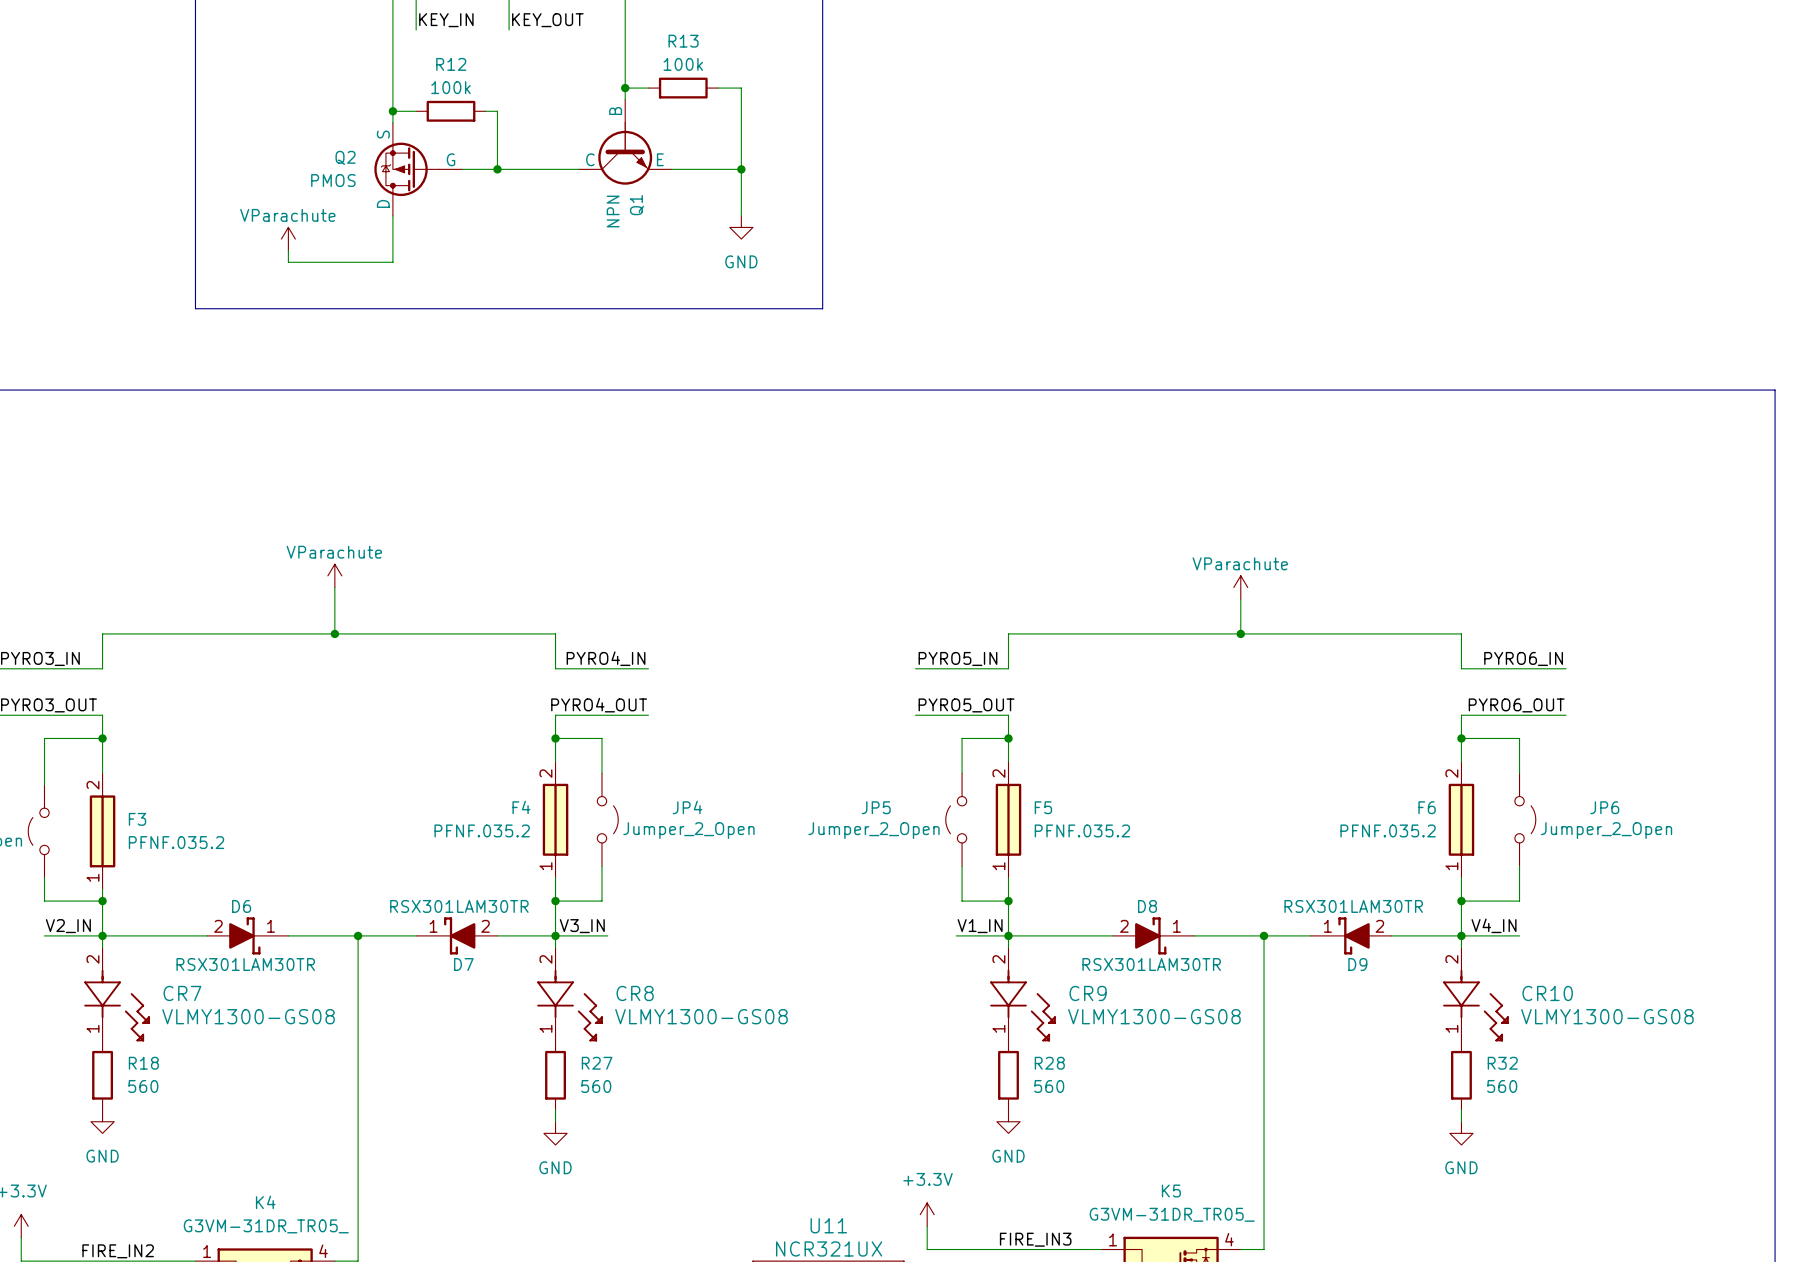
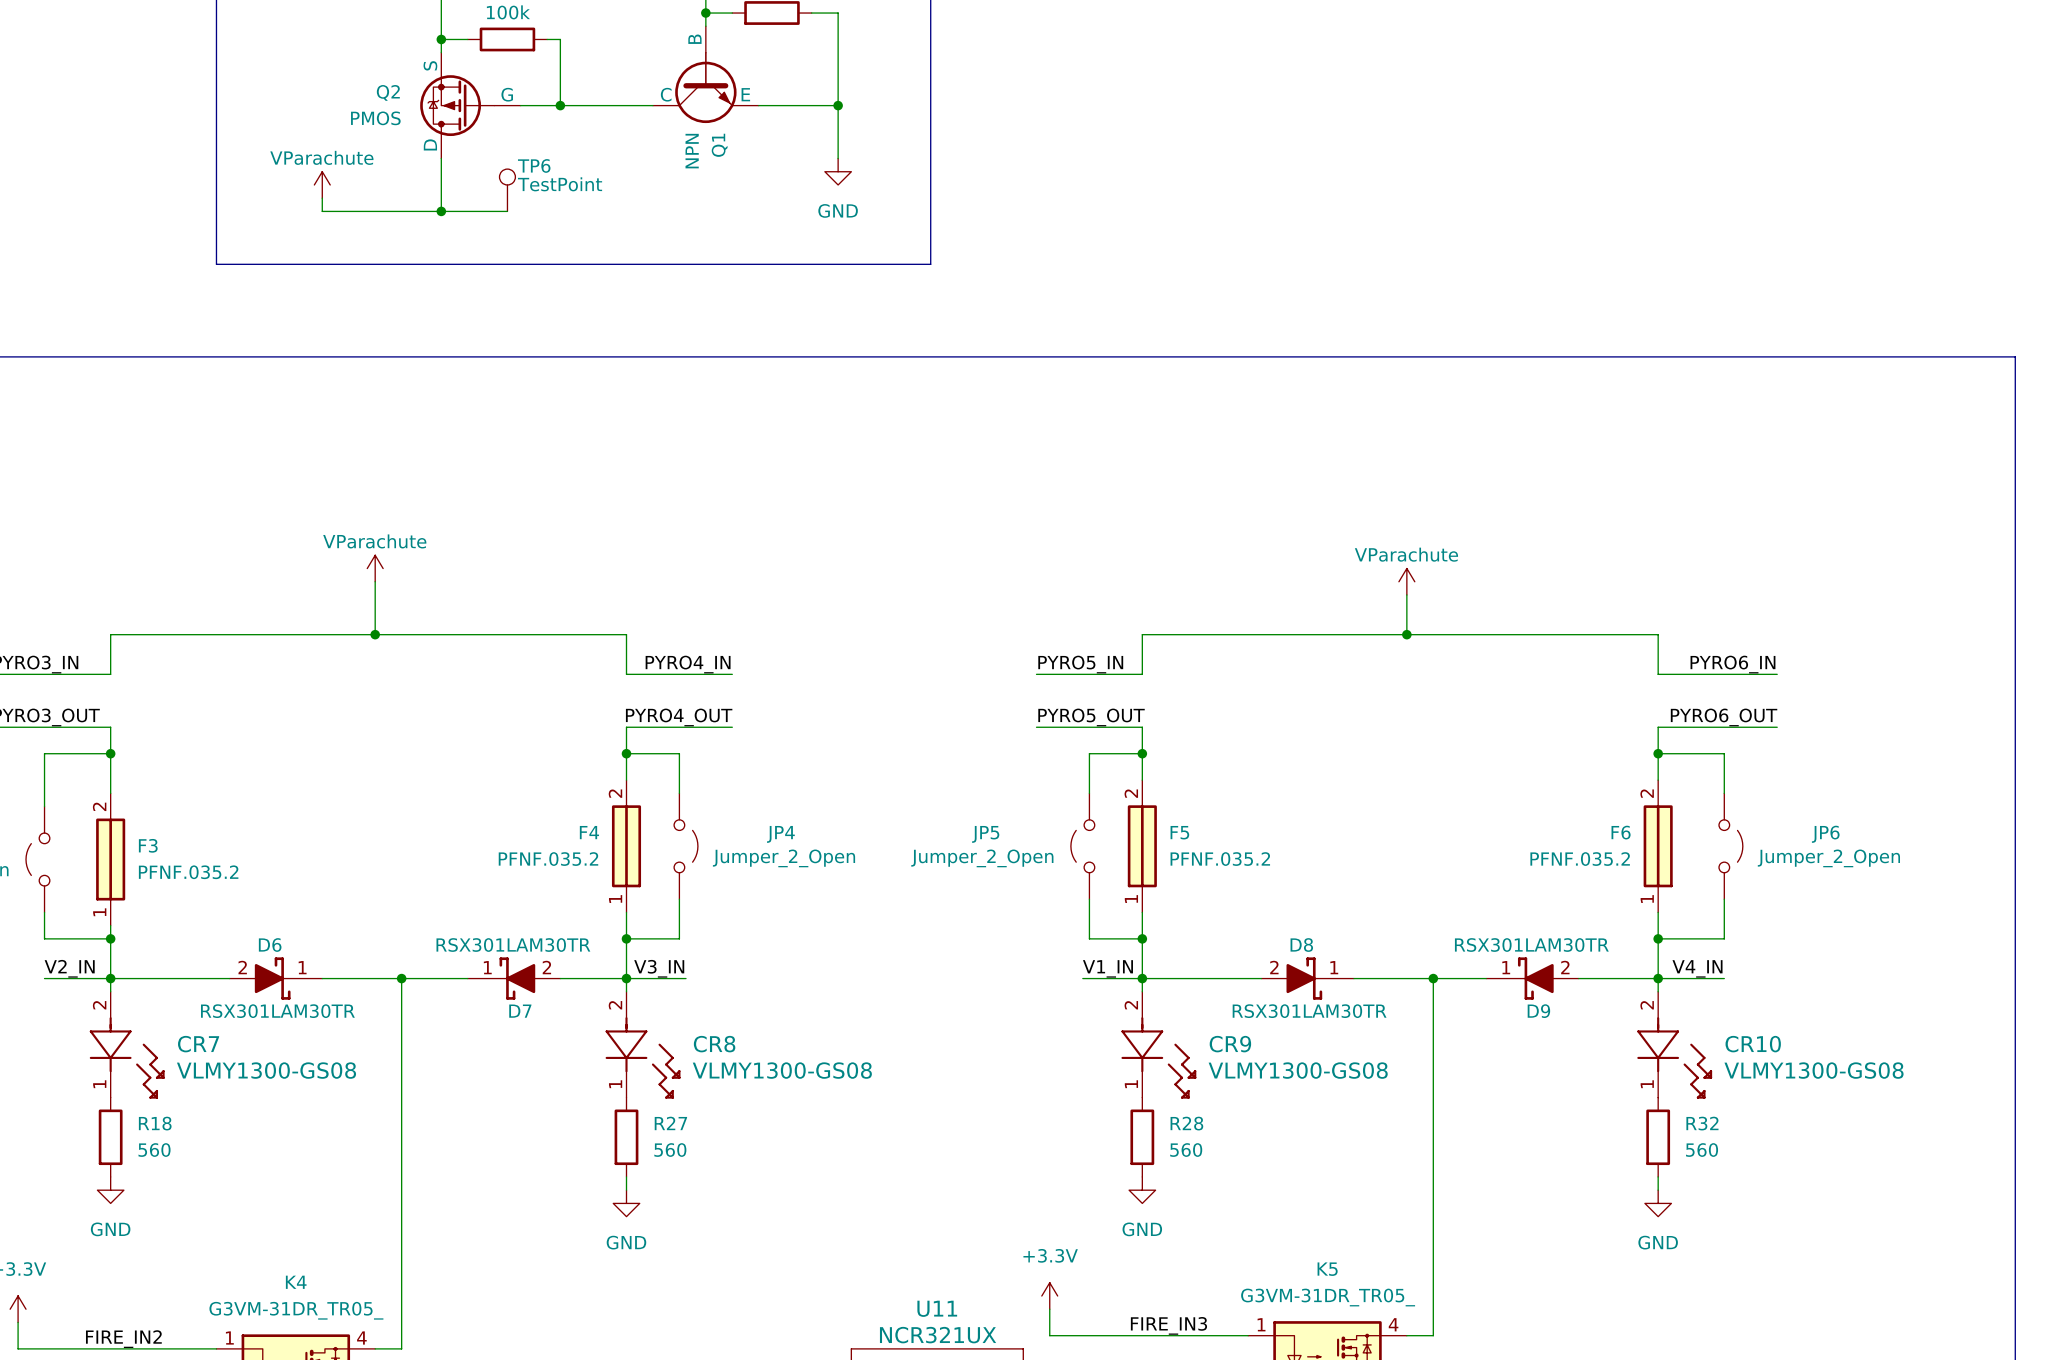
TP6: none -> TestPoint (507, 190)
wire: none -> (441, 211) (507, 211)
junction: none -> (441, 211)

